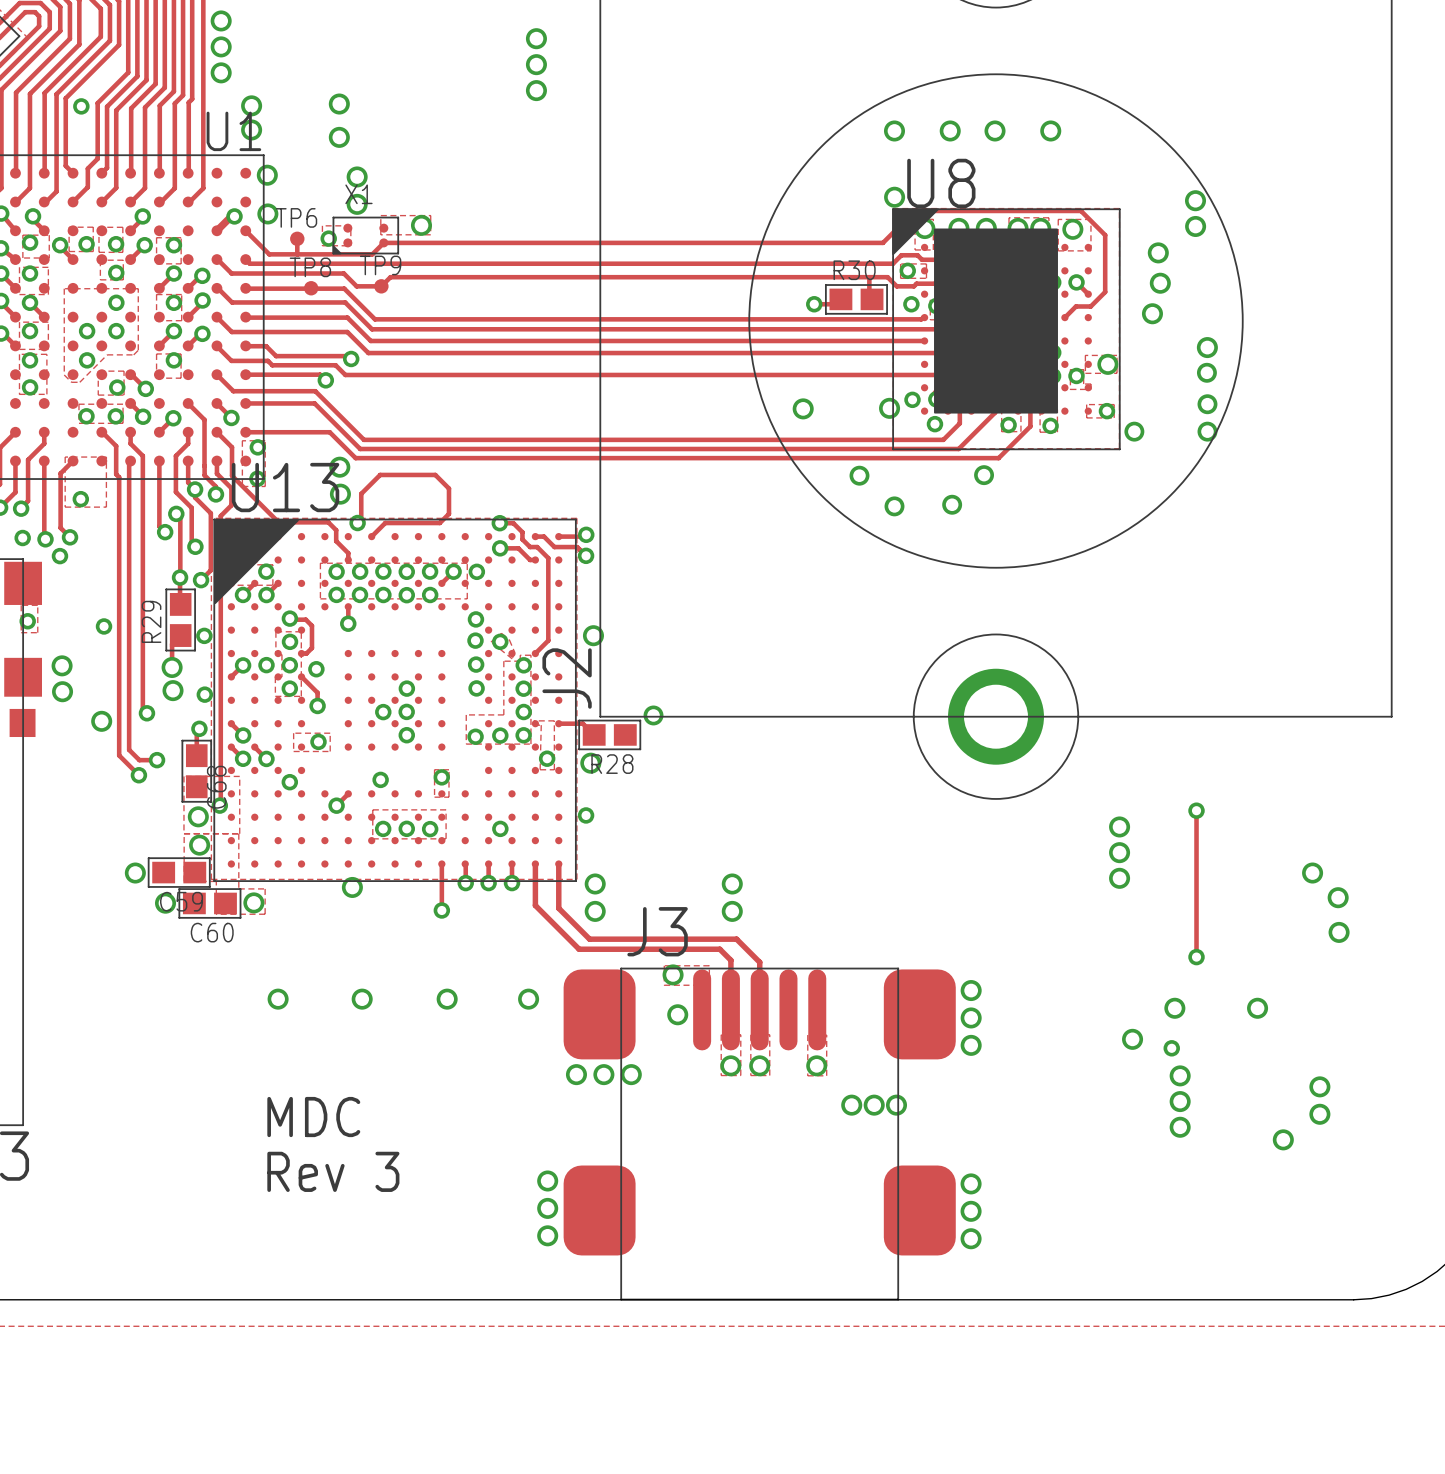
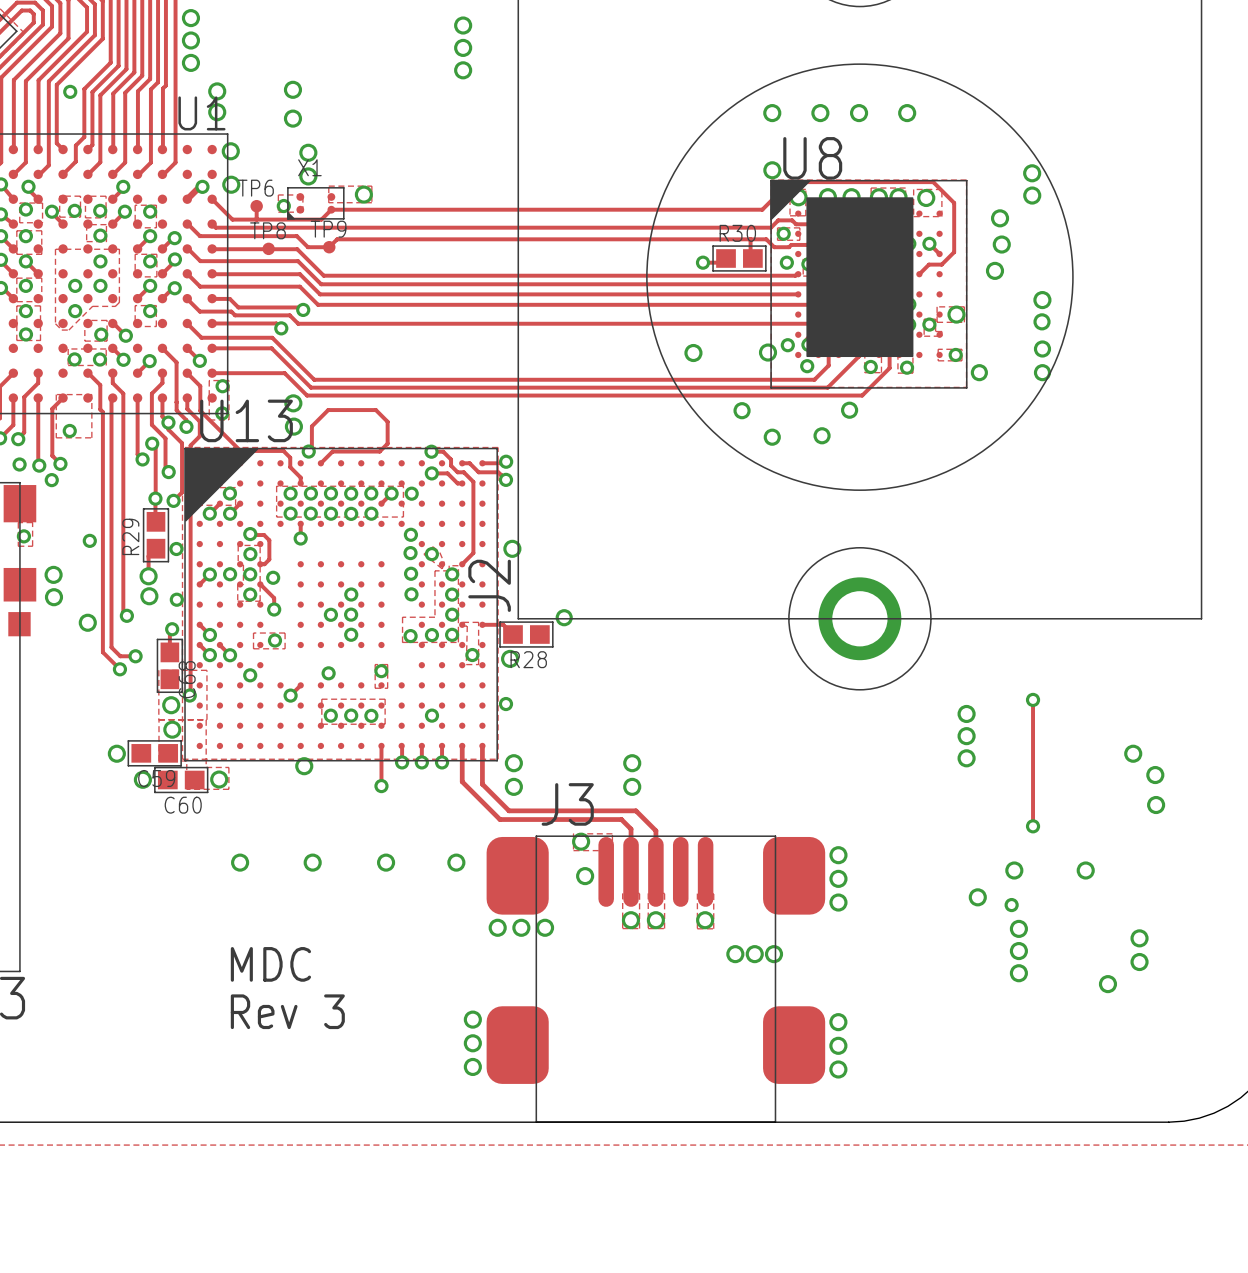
via: none -> (463, 25)
via: (536, 38) -> none
via: none -> (463, 47)
via: (536, 64) -> none
via: none -> (463, 70)
via: (536, 90) -> none

